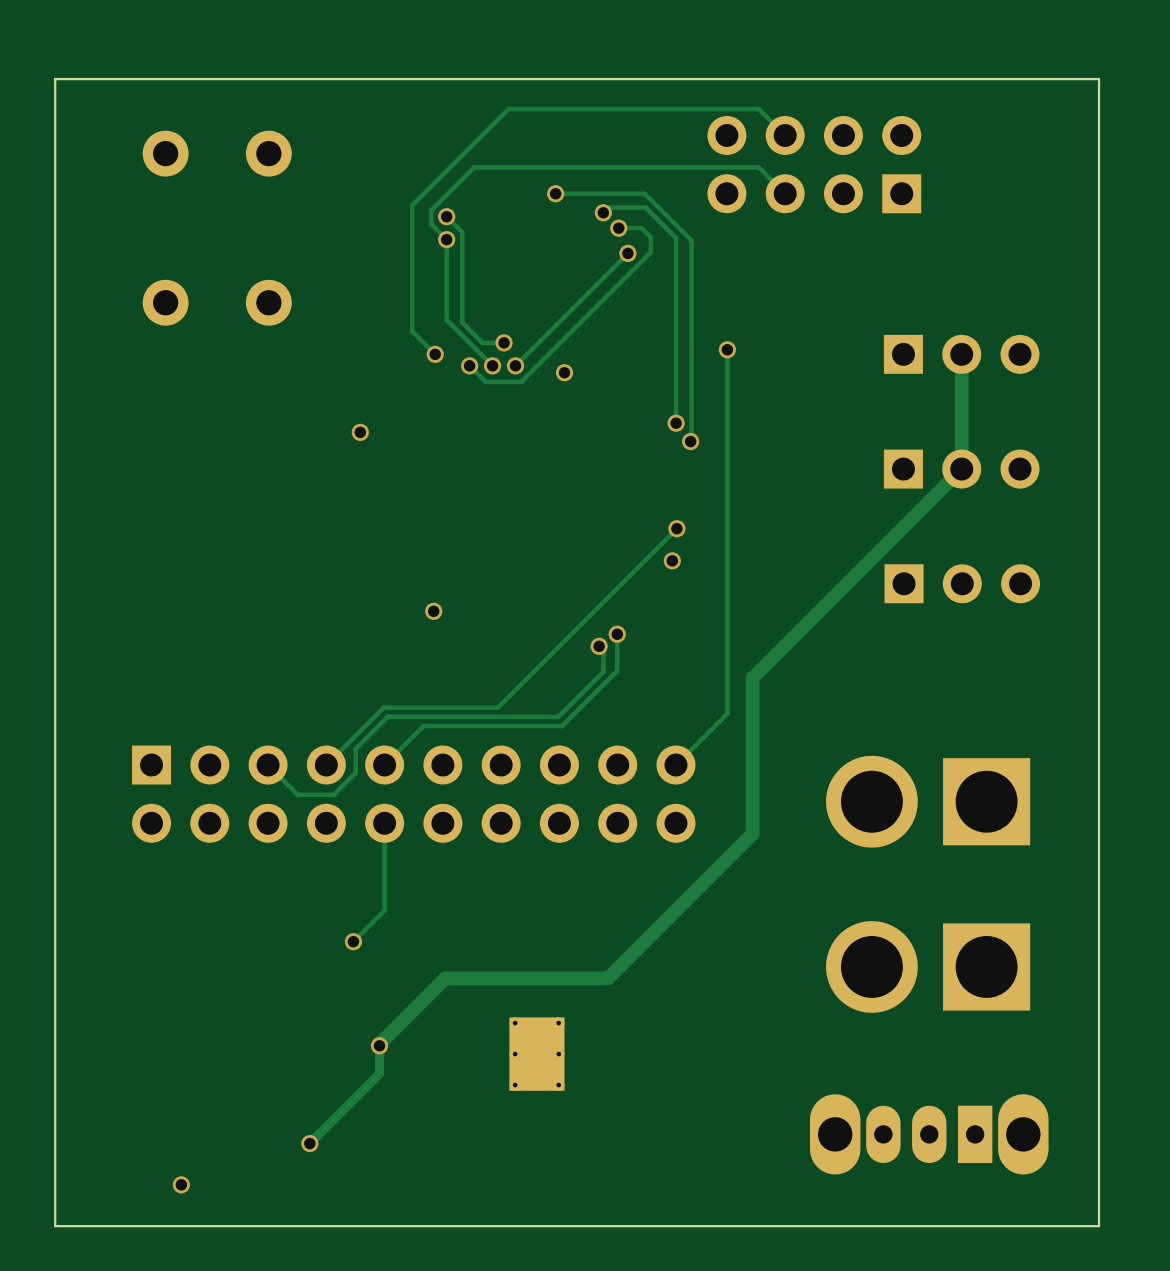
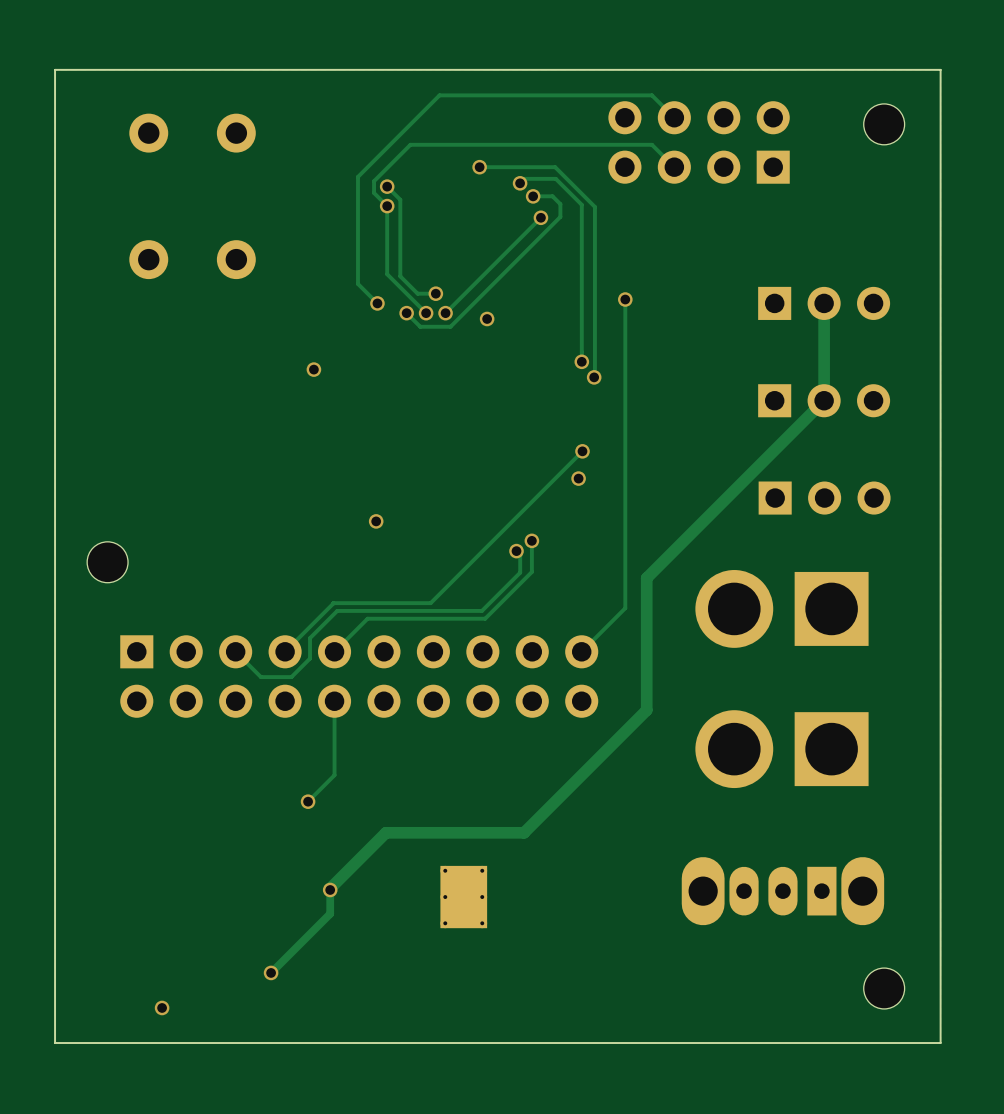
part: none -> (884, 124)
part: none -> (107, 562)
part: none -> (781, 608)
part: (928, 801) -> none
part: none -> (781, 749)
part: (928, 966) -> none
part: none -> (782, 891)
part: (929, 1134) -> none
part: none -> (884, 988)

